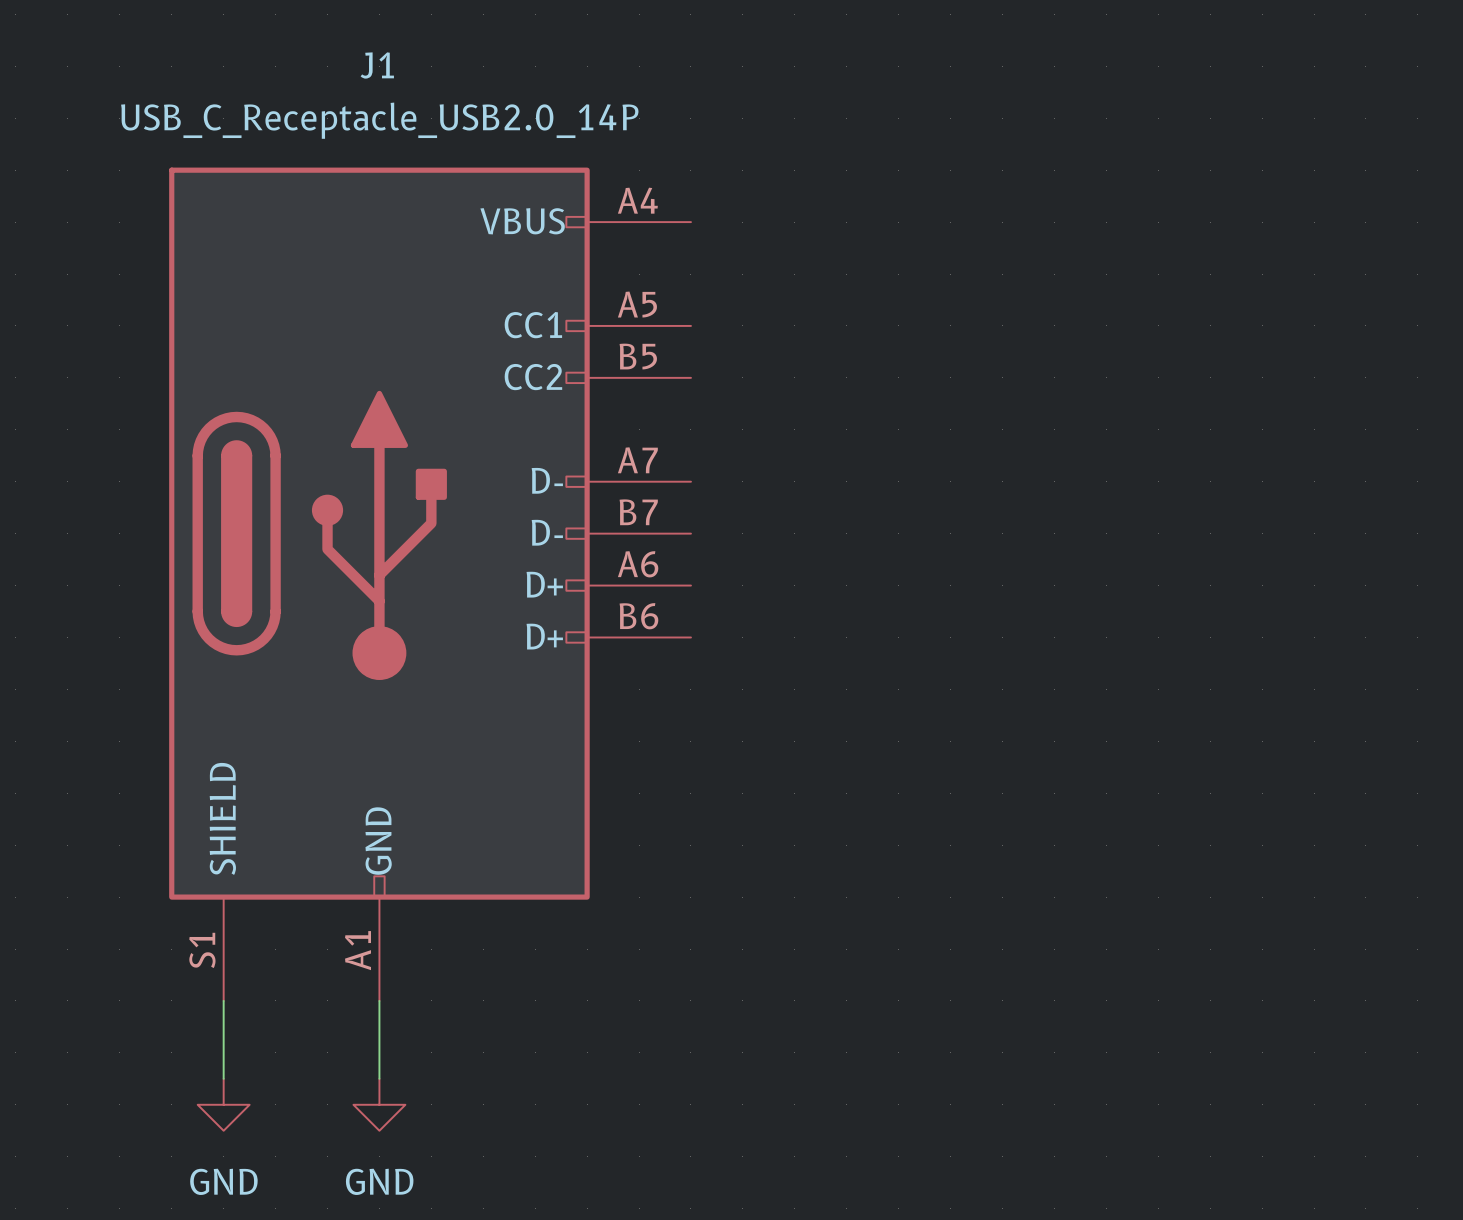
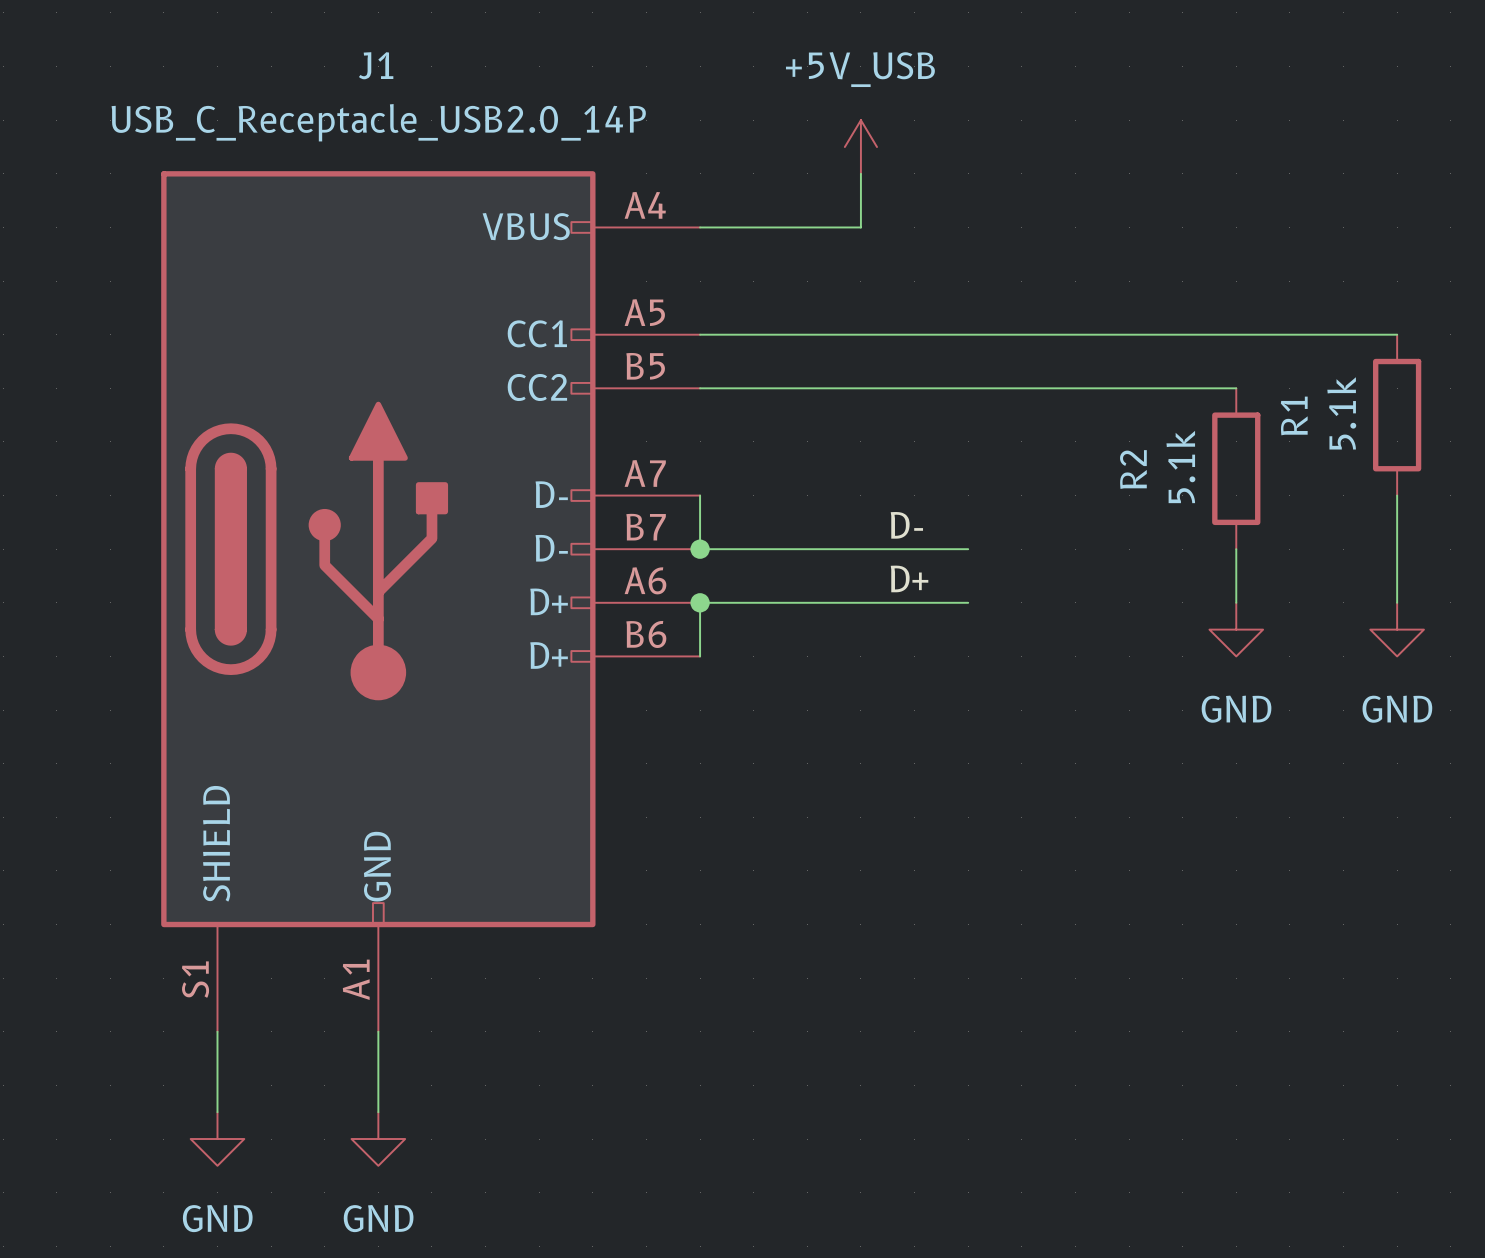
power symbol: none -> +5V_USB (860, 147)
wire: none -> (860, 173) (860, 227) (700, 227)
wire: none -> (700, 334) (1397, 334)
wire: none -> (700, 388) (1236, 388)
R1: none -> 5.1k (1397, 415)
R2: none -> 5.1k (1236, 468)
wire: none -> (700, 495) (700, 549) (968, 549)
wire: none -> (1397, 495) (1397, 602)
label: none -> D- (906, 525)
junction: none -> (700, 549)
wire: none -> (1236, 549) (1236, 602)
label: none -> D+ (909, 578)
junction: none -> (700, 602)
wire: none -> (968, 602) (700, 602) (700, 656)
power symbol: none -> GND (1236, 629)
power symbol: none -> GND (1397, 629)

